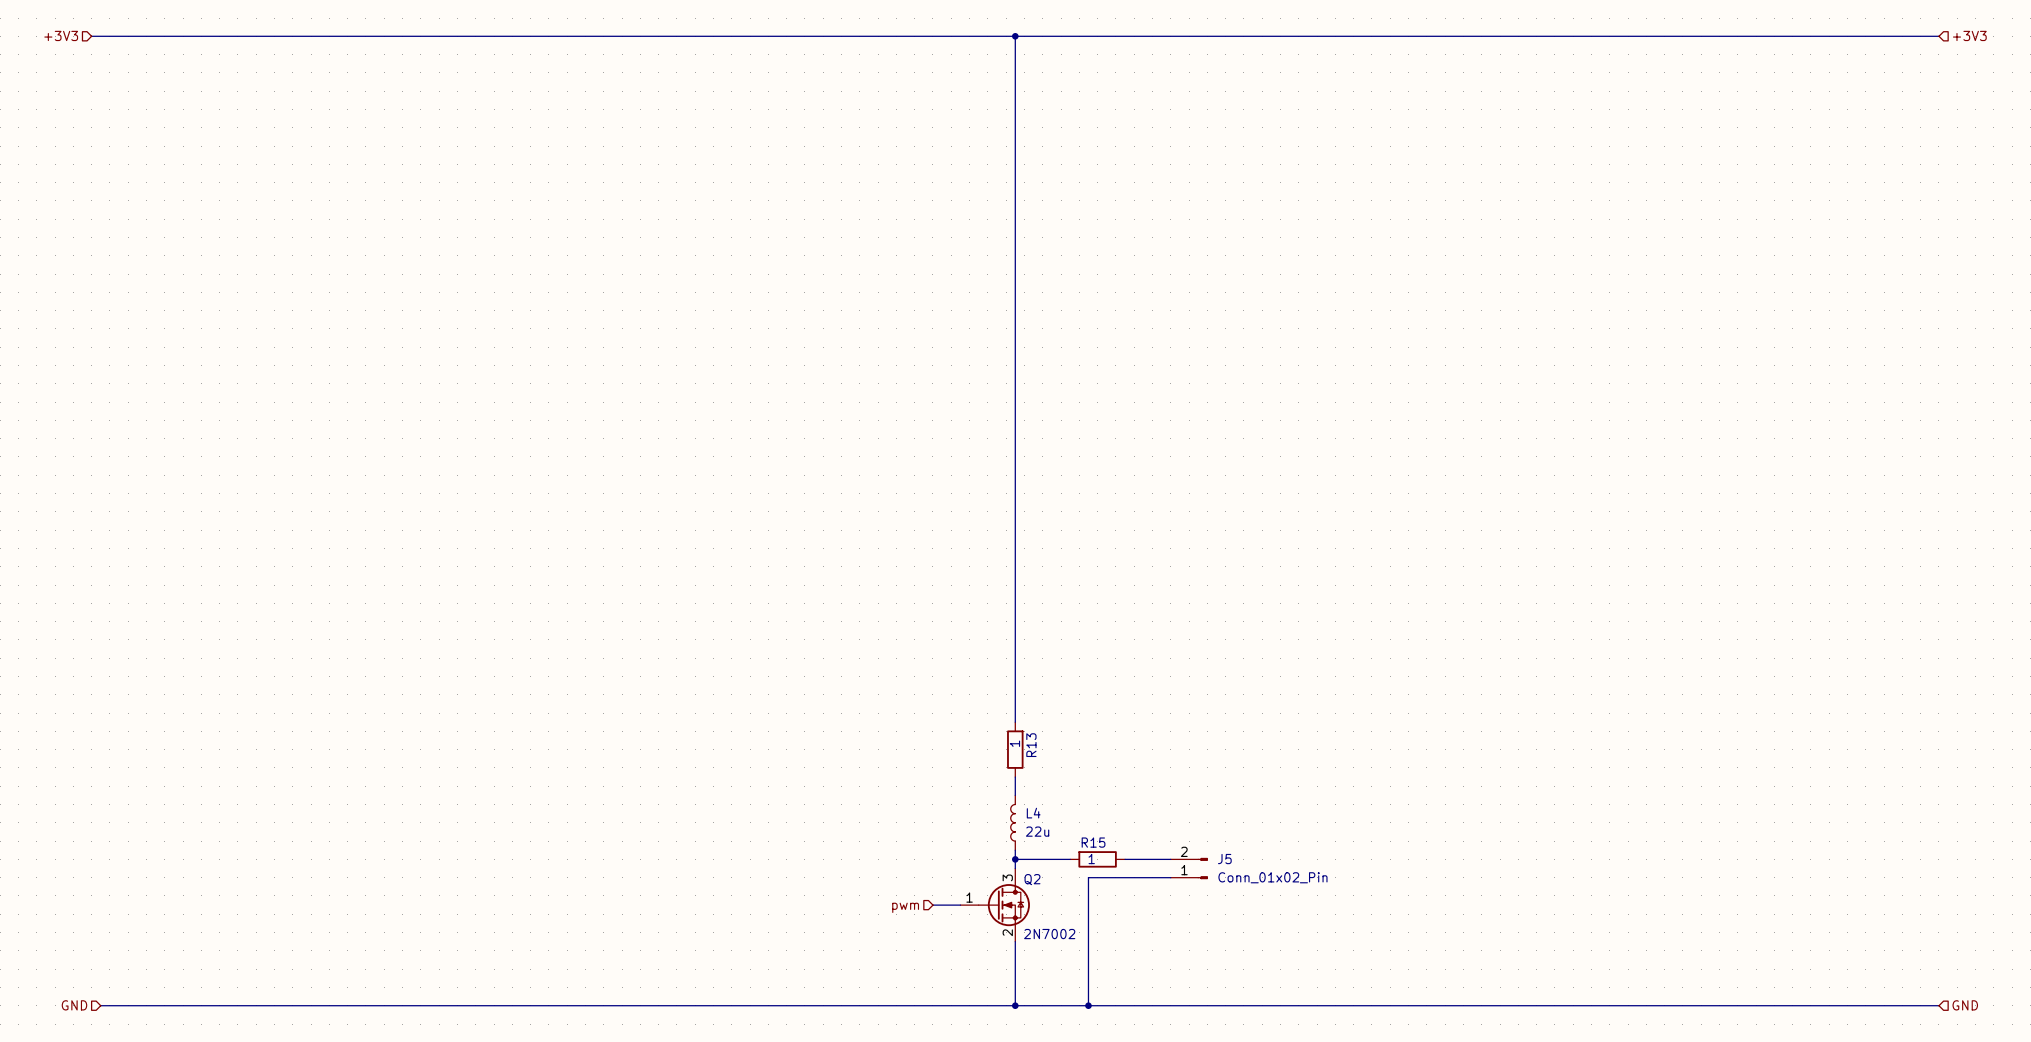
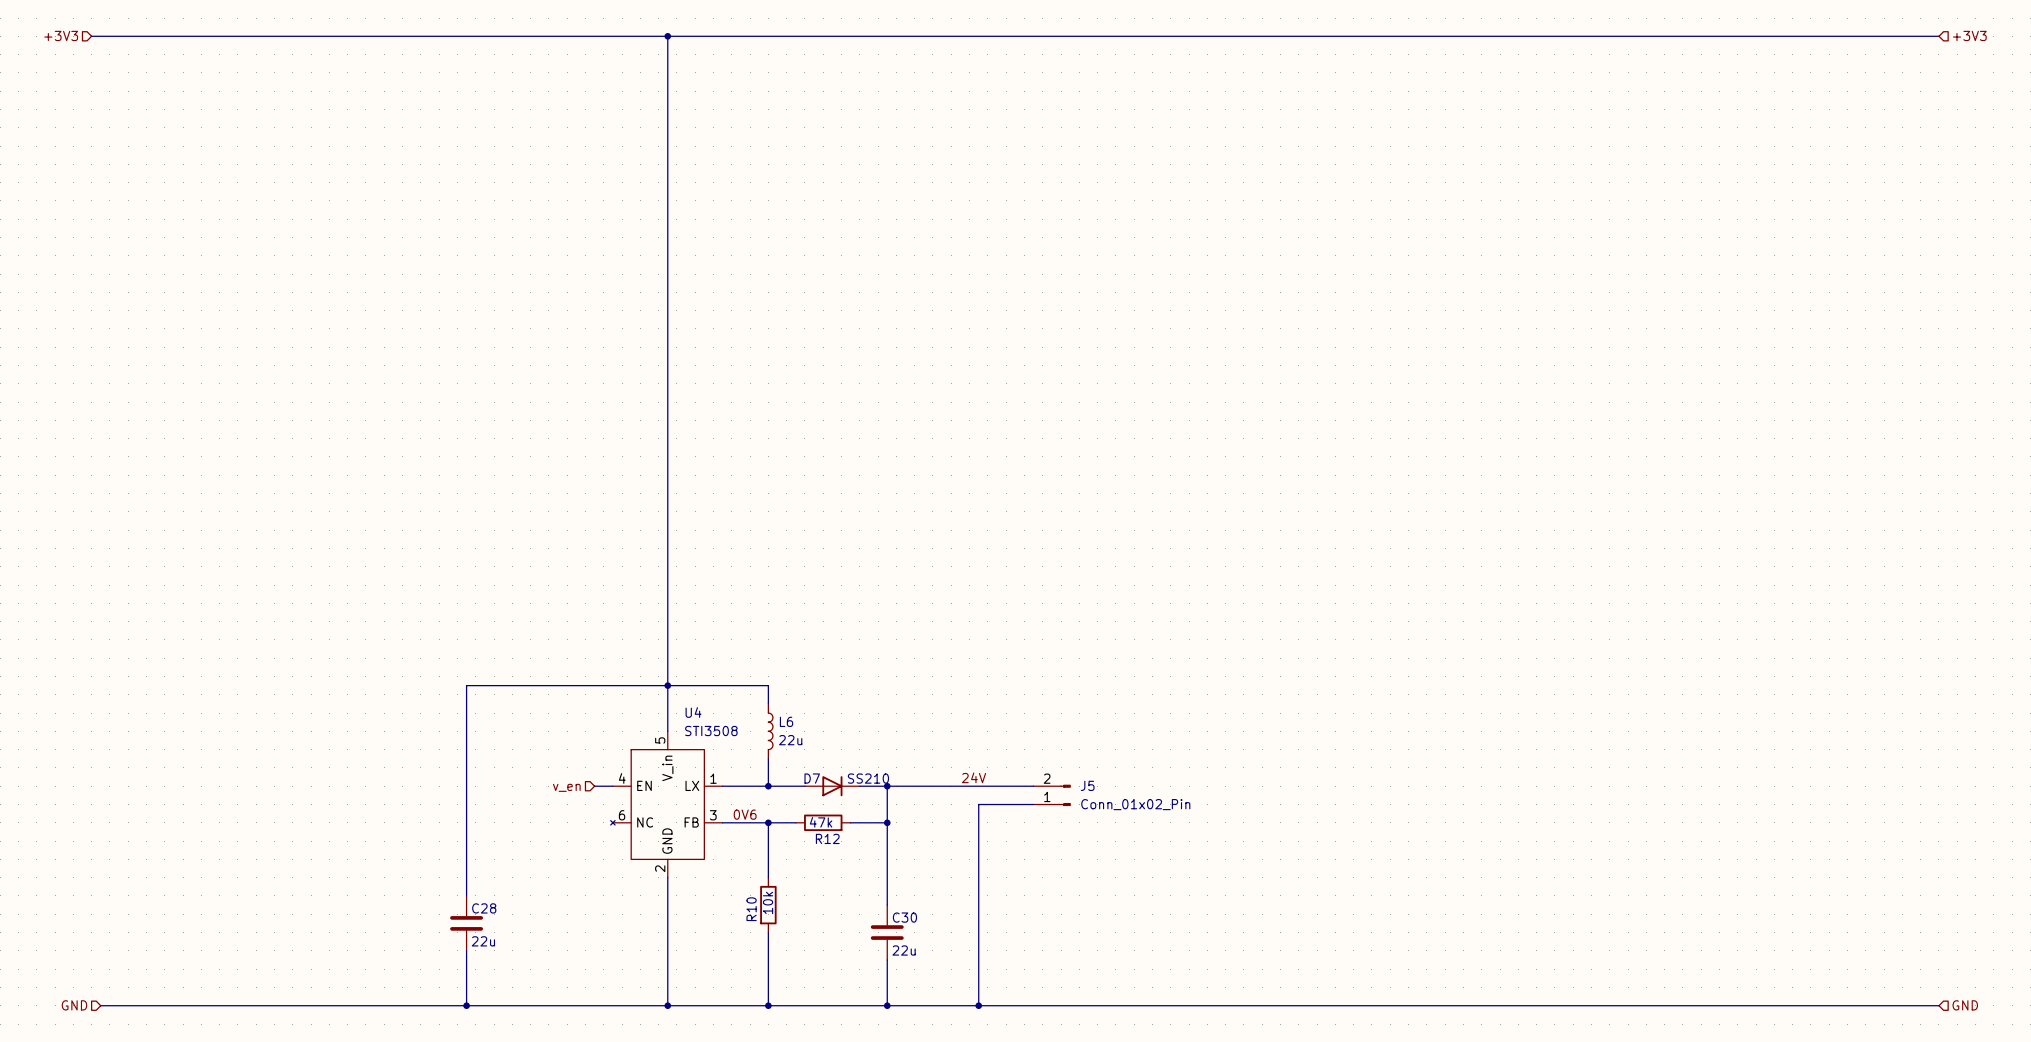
wire: none -> (667, 36) (667, 731)
junction: none -> (667, 36)
wire: (1015, 36) (1015, 722) -> none
junction: (1015, 36) -> none
junction: none -> (667, 685)
wire: none -> (768, 703) (768, 685) (466, 685) (466, 895)
L6: none -> 22u (770, 731)
R13: 1 (1015, 749) -> none
wire: none -> (768, 758) (768, 786)
label: none -> 24V (974, 777)
wire: (1015, 777) (1015, 795) -> none
wire: none -> (594, 786) (612, 786)
wire: none -> (722, 786) (804, 786)
junction: none -> (768, 786)
D7: none -> SS210 (832, 786)
wire: none -> (859, 786) (1033, 786)
wire: none -> (887, 786) (887, 905)
junction: none -> (887, 786)
hierarchical label: none -> v_en (566, 787)
U4: none -> STI3508 (666, 804)
wire: none -> (1033, 804) (978, 804) (978, 1005)
label: none -> 0V6 (745, 814)
wire: none -> (722, 822) (795, 822)
wire: none -> (768, 822) (768, 877)
junction: none -> (768, 822)
R12: none -> 47k (823, 822)
wire: none -> (850, 822) (887, 822)
junction: none -> (887, 822)
L4: 22u (1013, 822) -> none
wire: (1015, 850) (1015, 868) -> none
wire: (1015, 859) (1070, 859) -> none
junction: (1015, 859) -> none
R15: 1 (1097, 859) -> none
wire: (1125, 859) (1170, 859) -> none
J5 position: (1189, 868) -> (1052, 795)
wire: none -> (667, 877) (667, 1005)
wire: (1170, 877) (1088, 877) (1088, 1005) -> none
R10: none -> 10k (768, 905)
wire: (932, 905) (960, 905) -> none
Q2: 2N7002 (995, 905) -> none
hierarchical label: pwm (905, 907) -> none
C28: none -> 22u (466, 923)
wire: none -> (768, 932) (768, 1005)
C30: none -> 22u (887, 932)
wire: (1015, 941) (1015, 1005) -> none
wire: none -> (466, 950) (466, 1005)
wire: none -> (887, 959) (887, 1005)
junction: none -> (466, 1005)
junction: none -> (667, 1005)
junction: none -> (768, 1005)
junction: none -> (887, 1005)
junction position: (1015, 1005) -> (978, 1005)
junction: (1088, 1005) -> none

